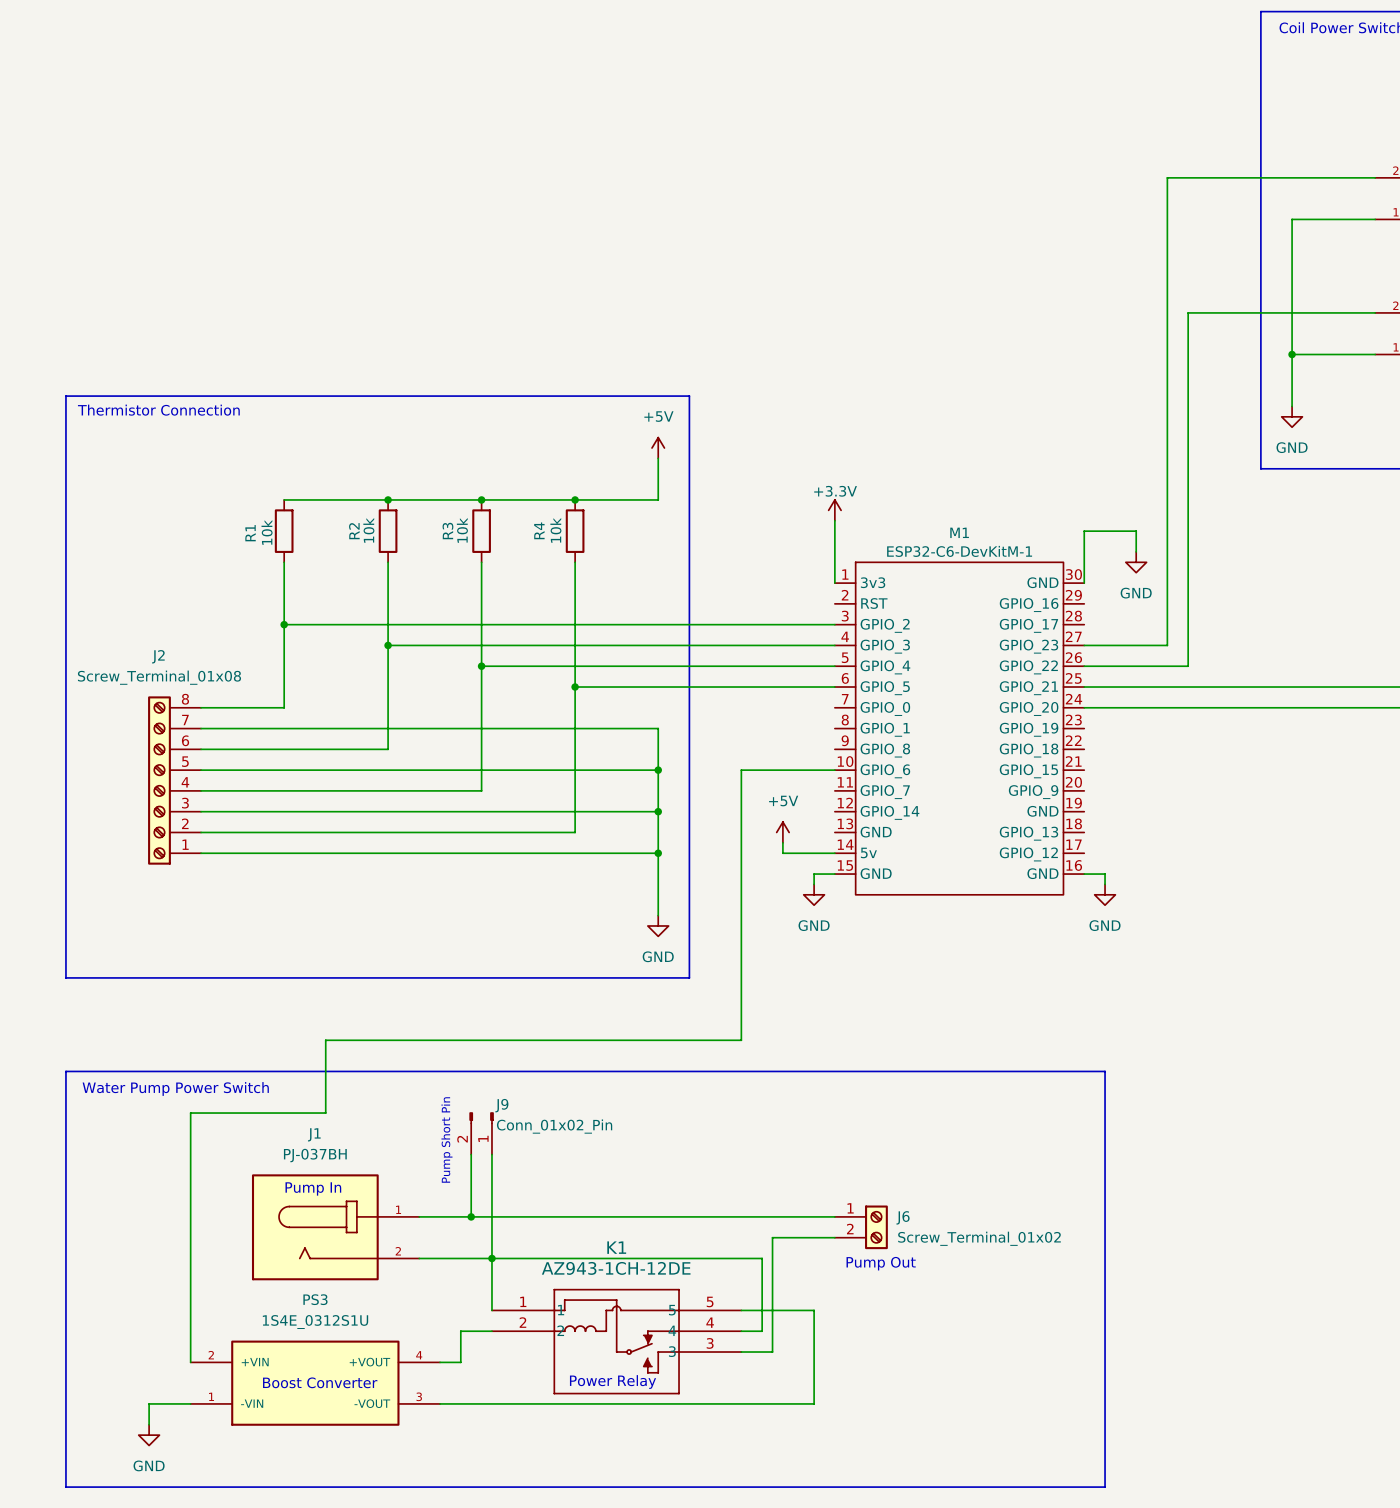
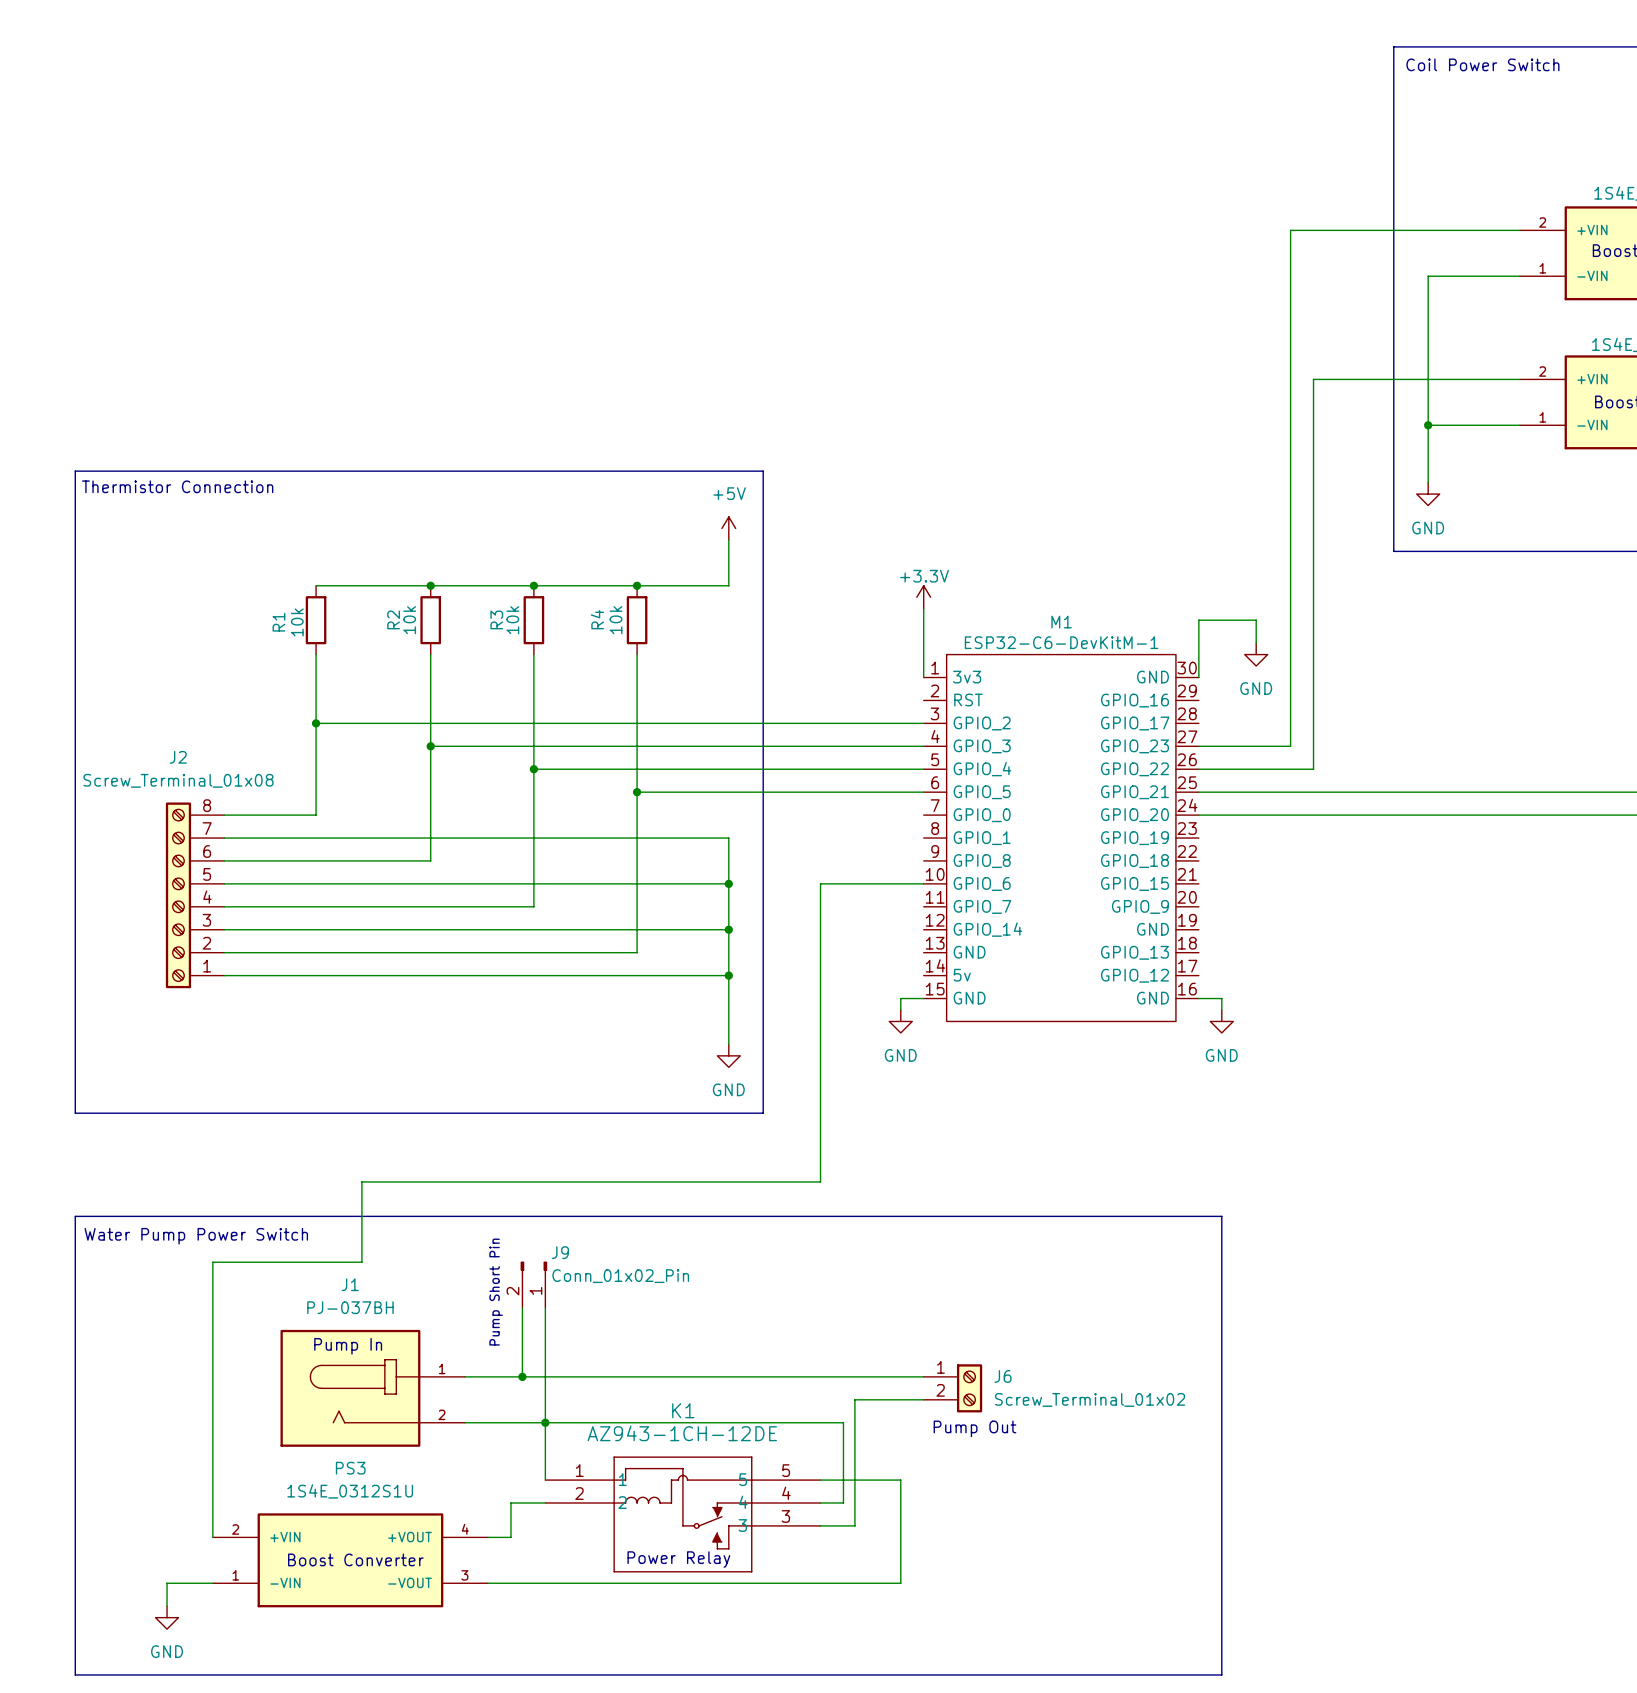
power symbol: +5V (782, 832) -> none
wire: (782, 842) (782, 853) (834, 853) -> none

